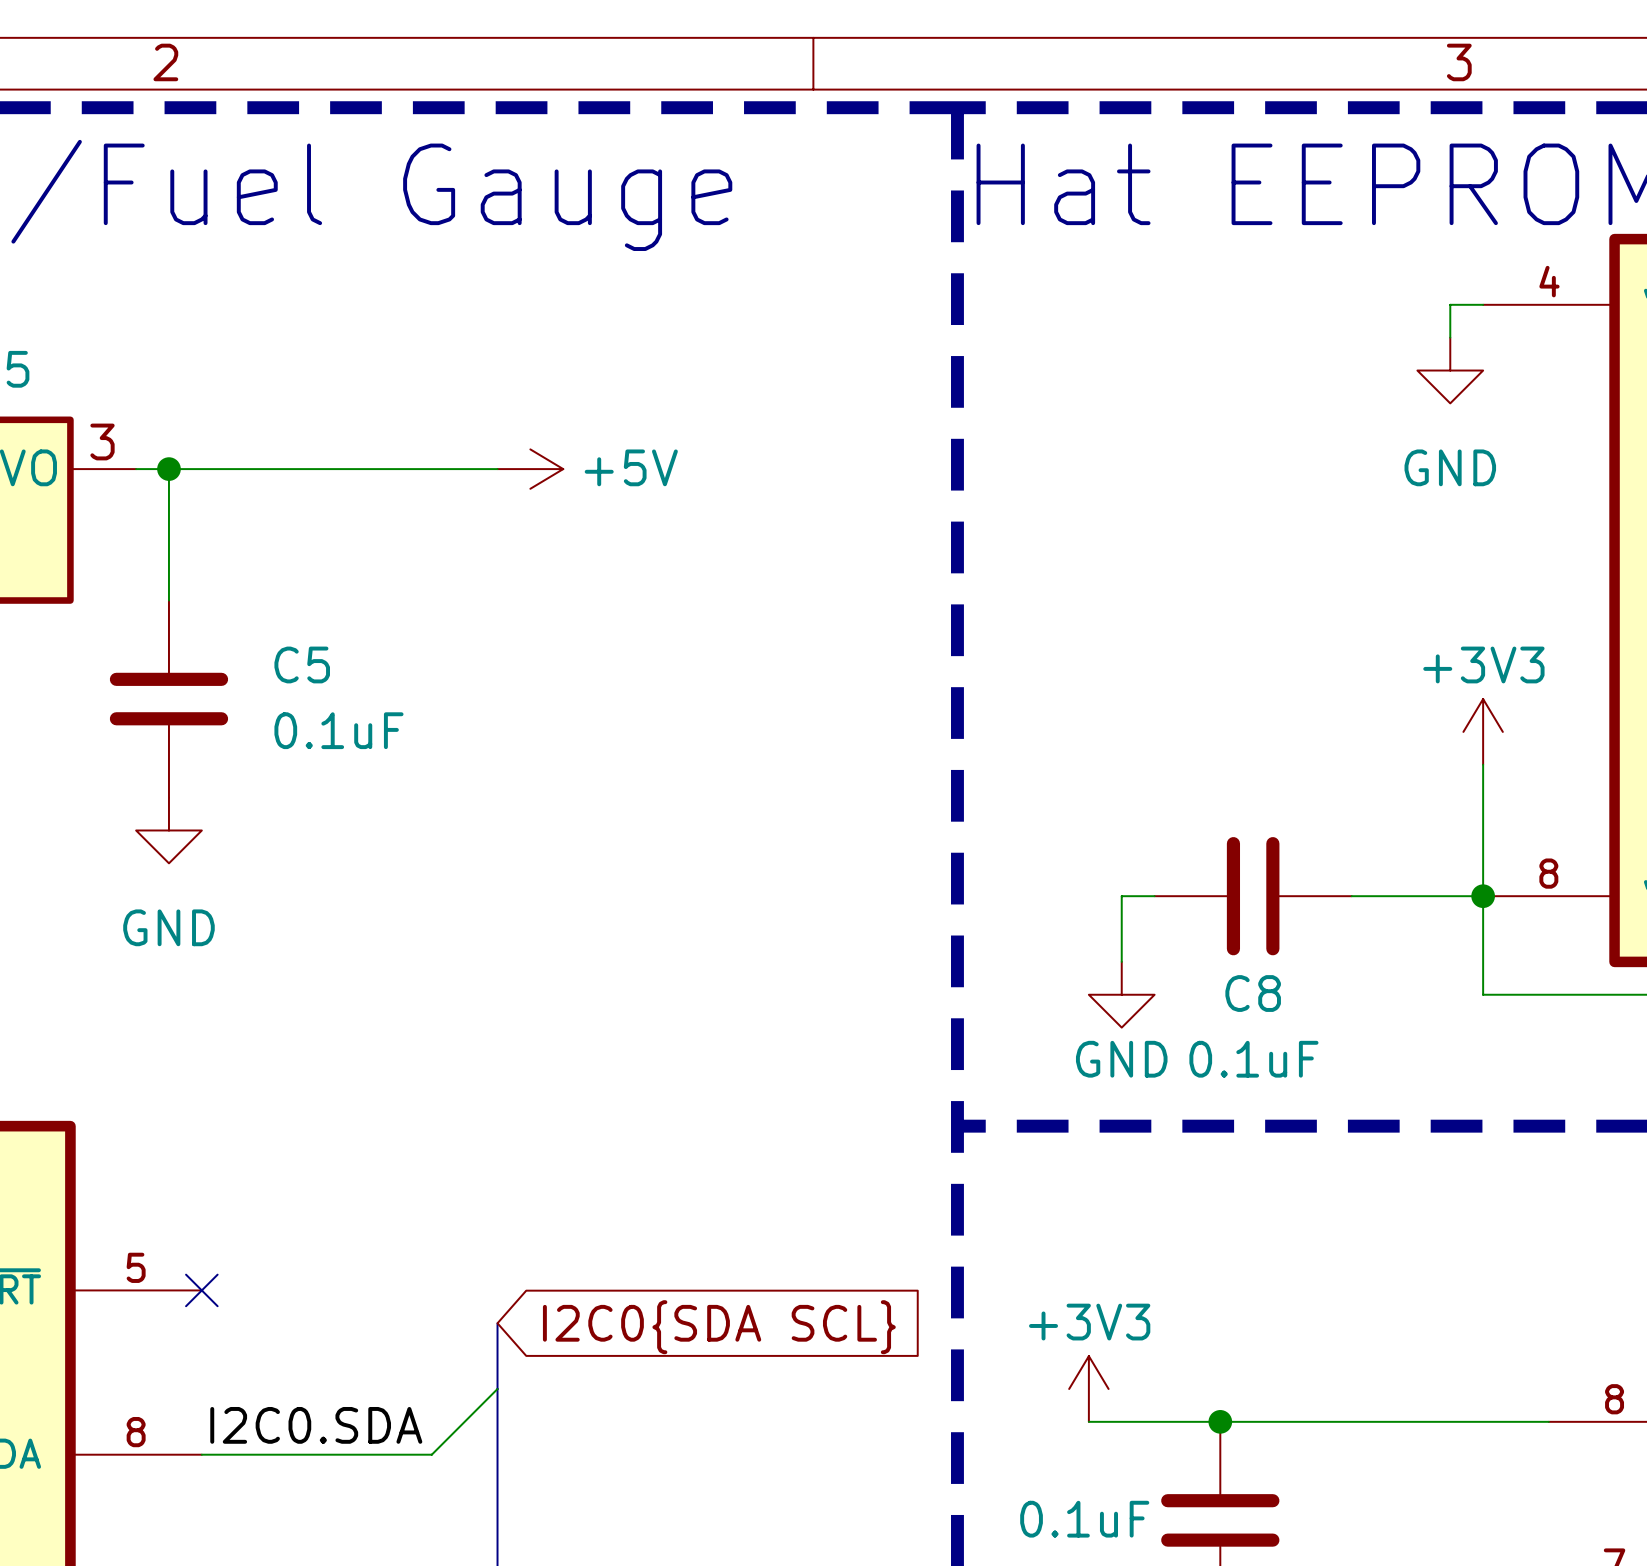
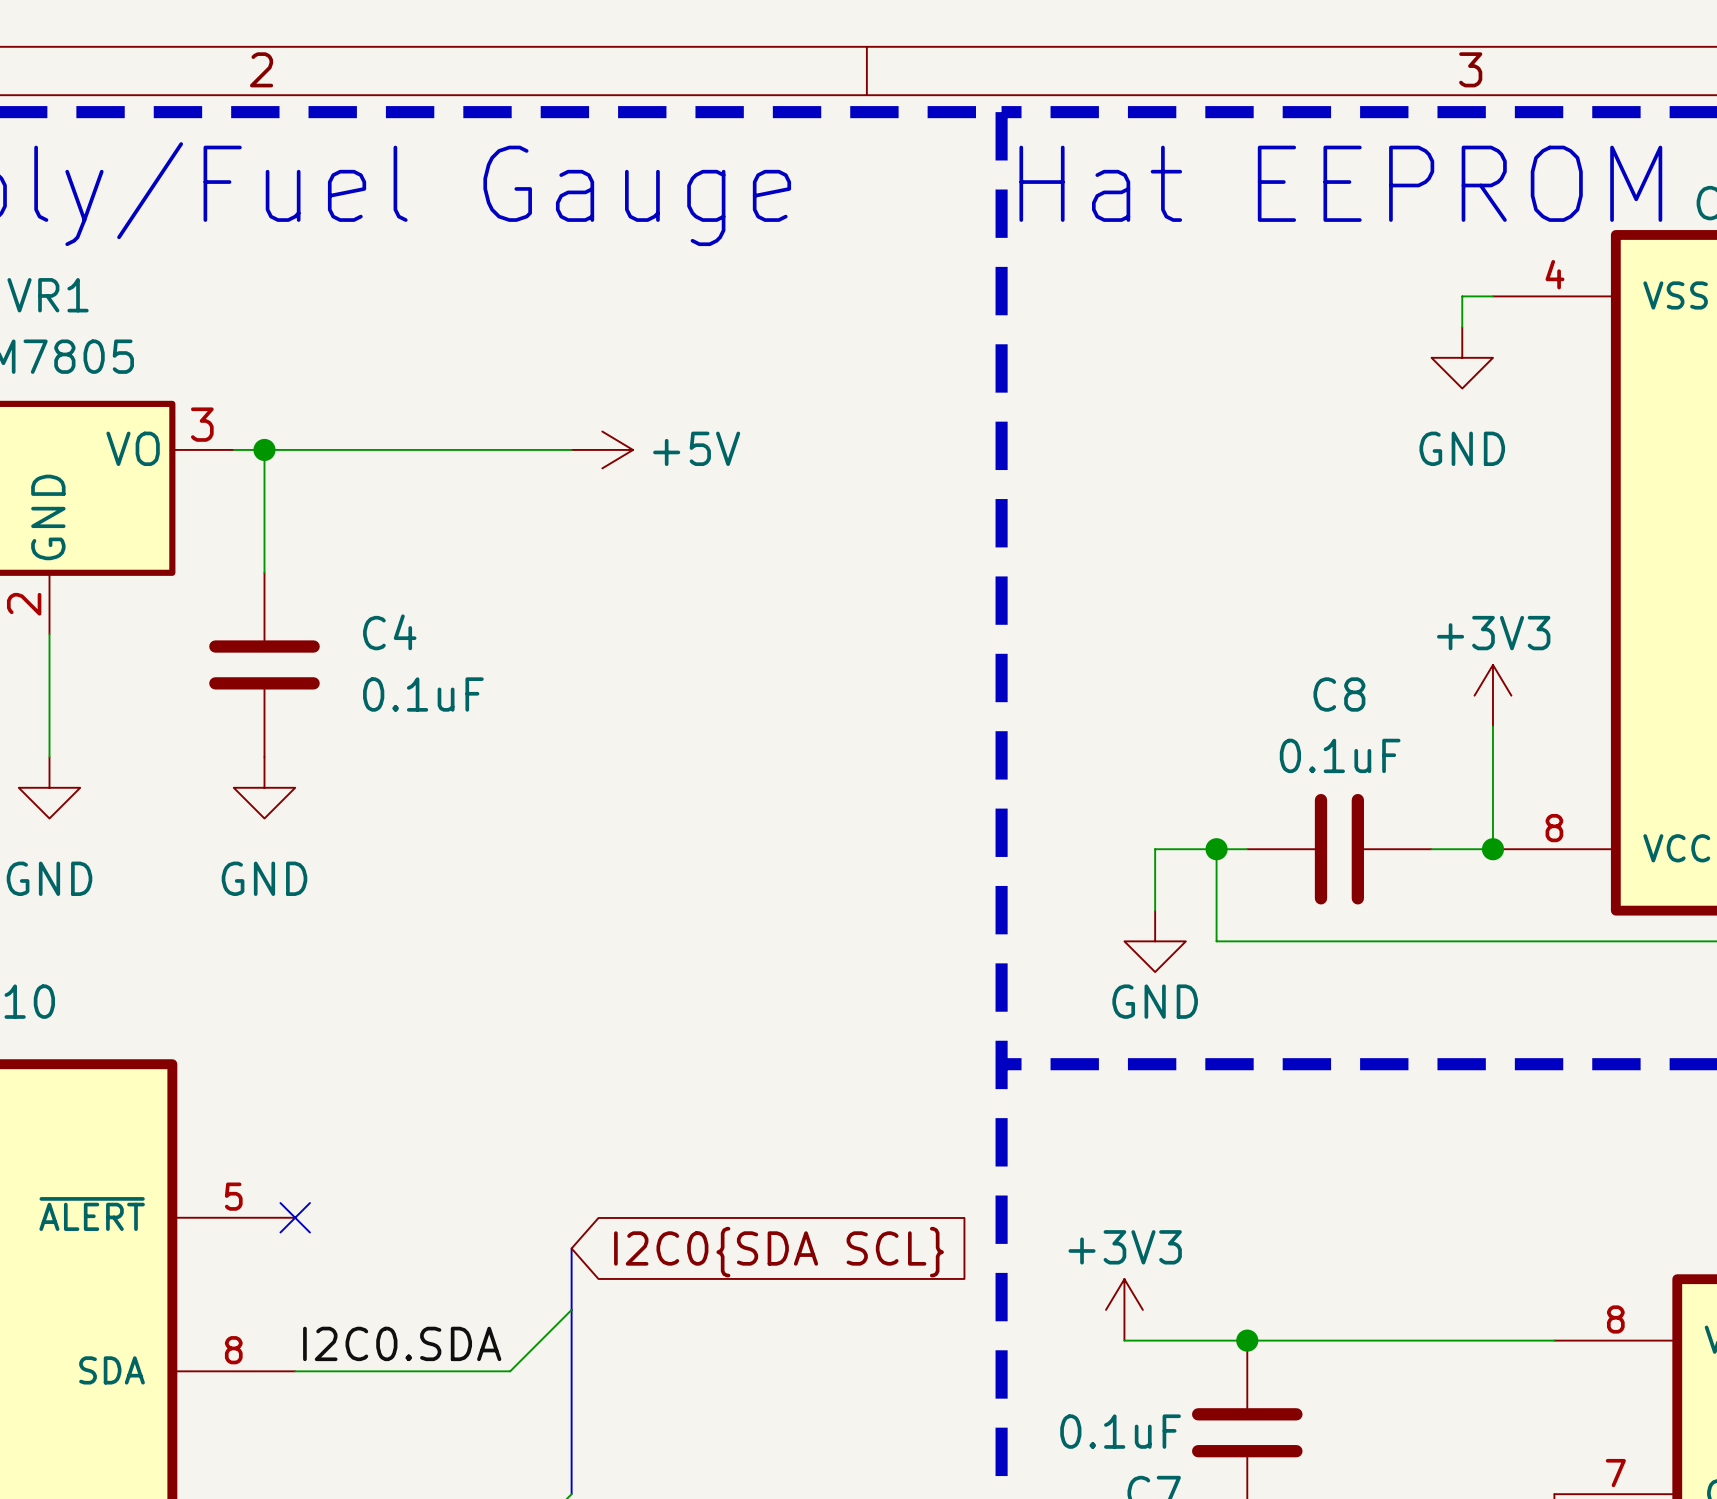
C5 name: C5 (302, 664) -> C4 (389, 632)
junction: none -> (1216, 849)
C8 position: (1253, 896) -> (1339, 849)
wire: (1483, 896) (1483, 994) -> (1216, 849) (1216, 941) (1492, 941)
C8 name position: C8 (1253, 993) -> C8 (1339, 694)
C8 value position: 0.1uF (1253, 1059) -> 0.1uF (1340, 755)

